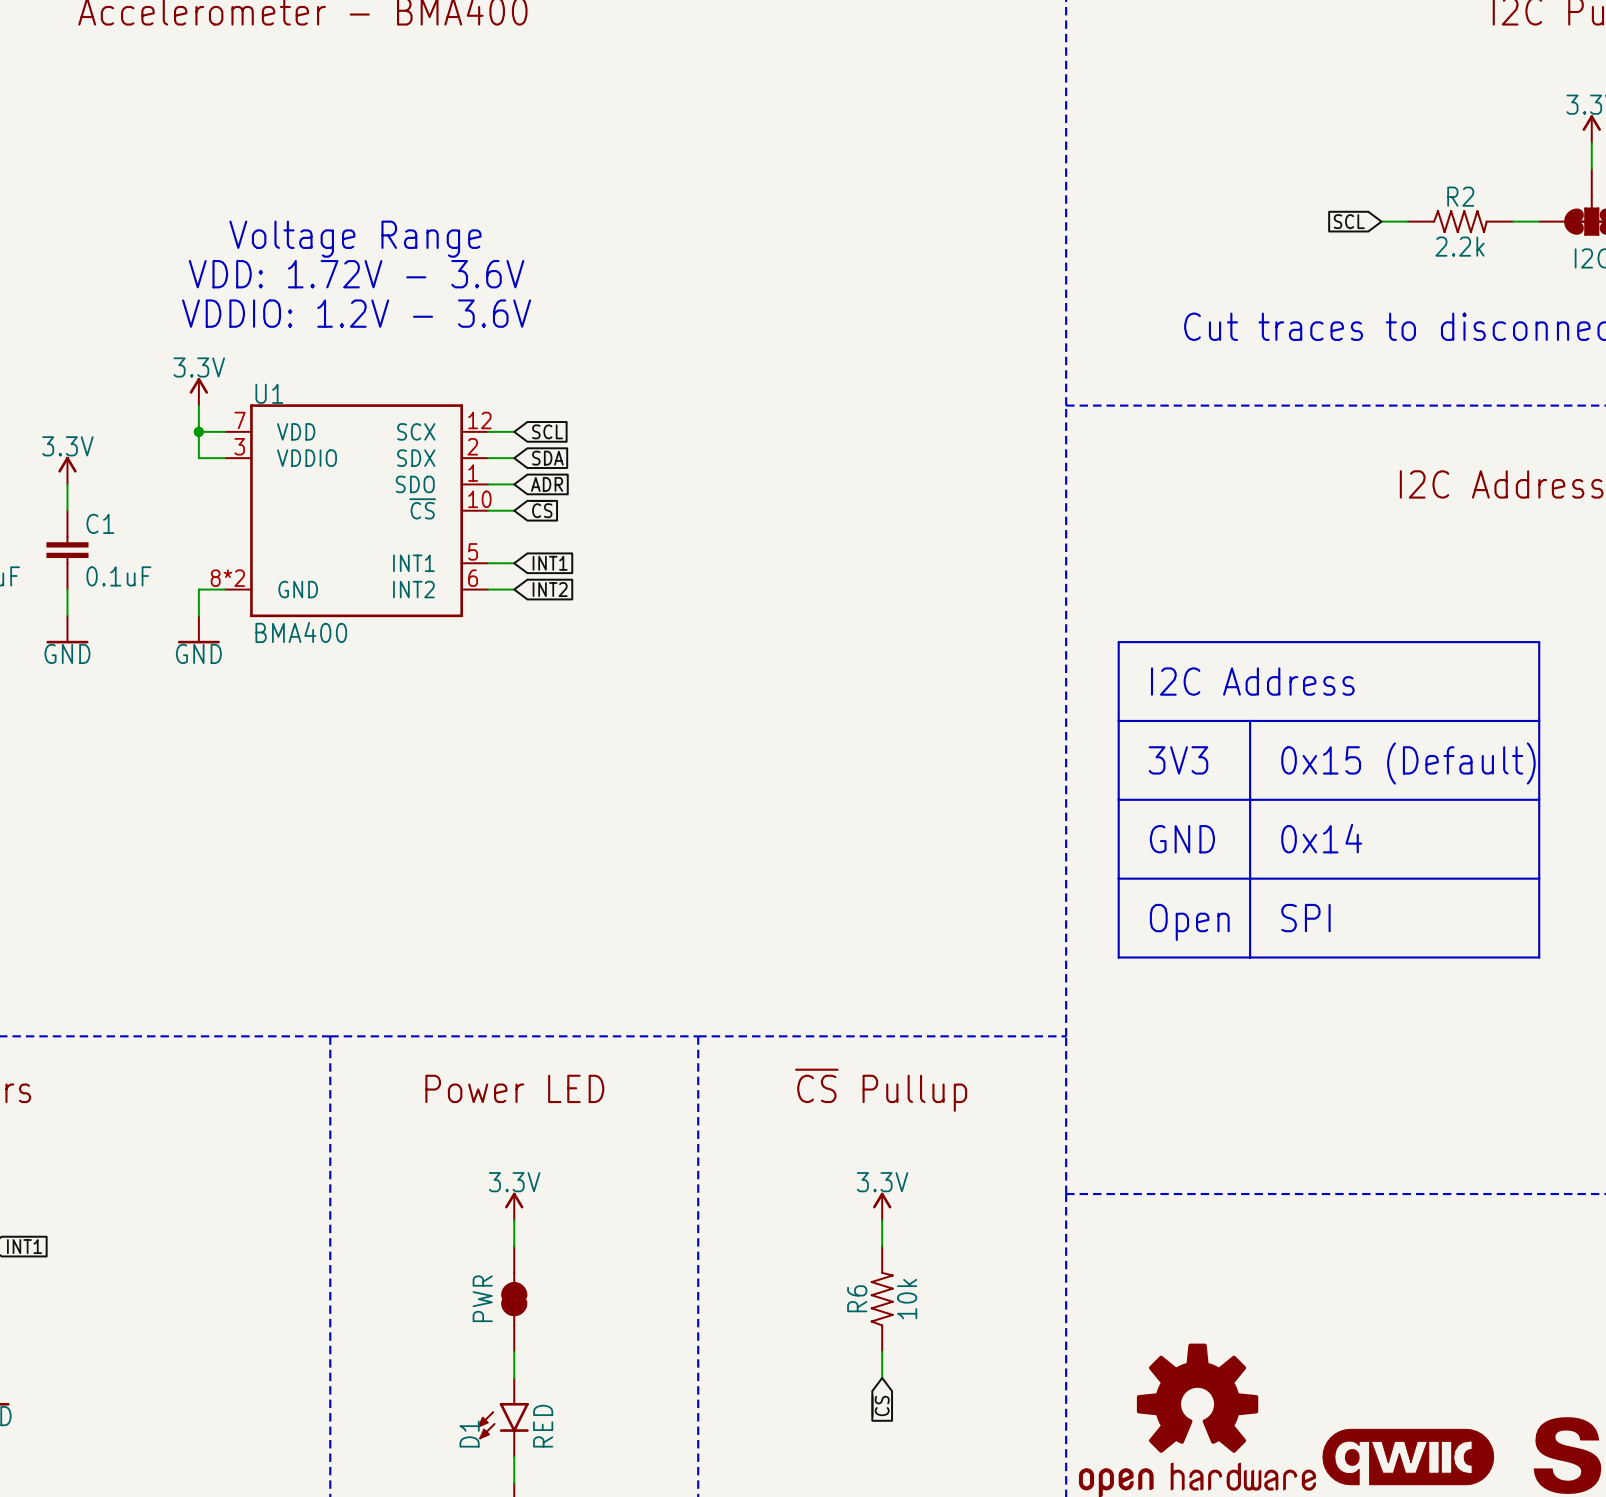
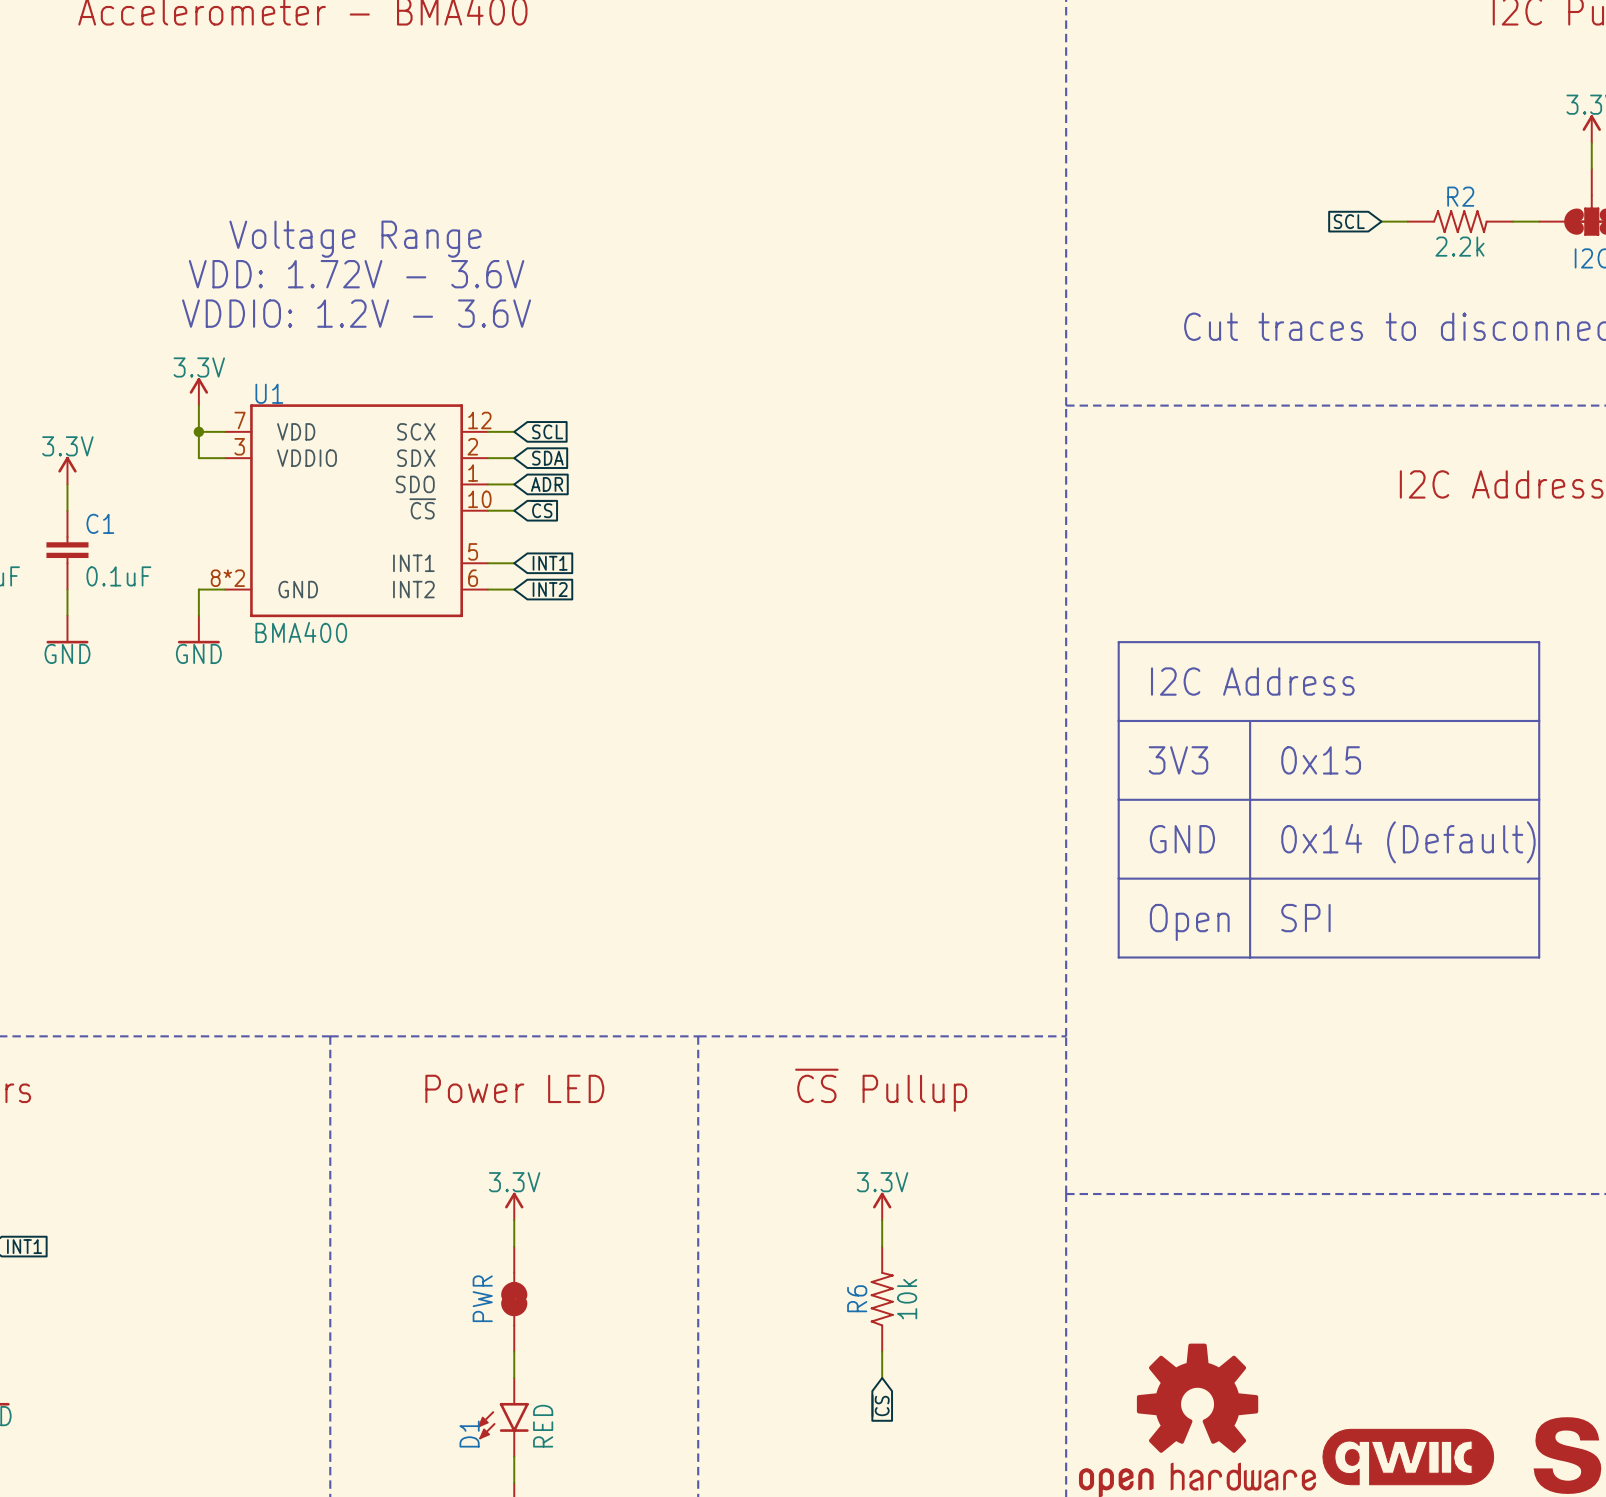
text: 0x15 (Default) (1408, 763) -> 0x15 (1321, 760)
text: 0x14 (1321, 838) -> 0x14 (Default) (1408, 842)

